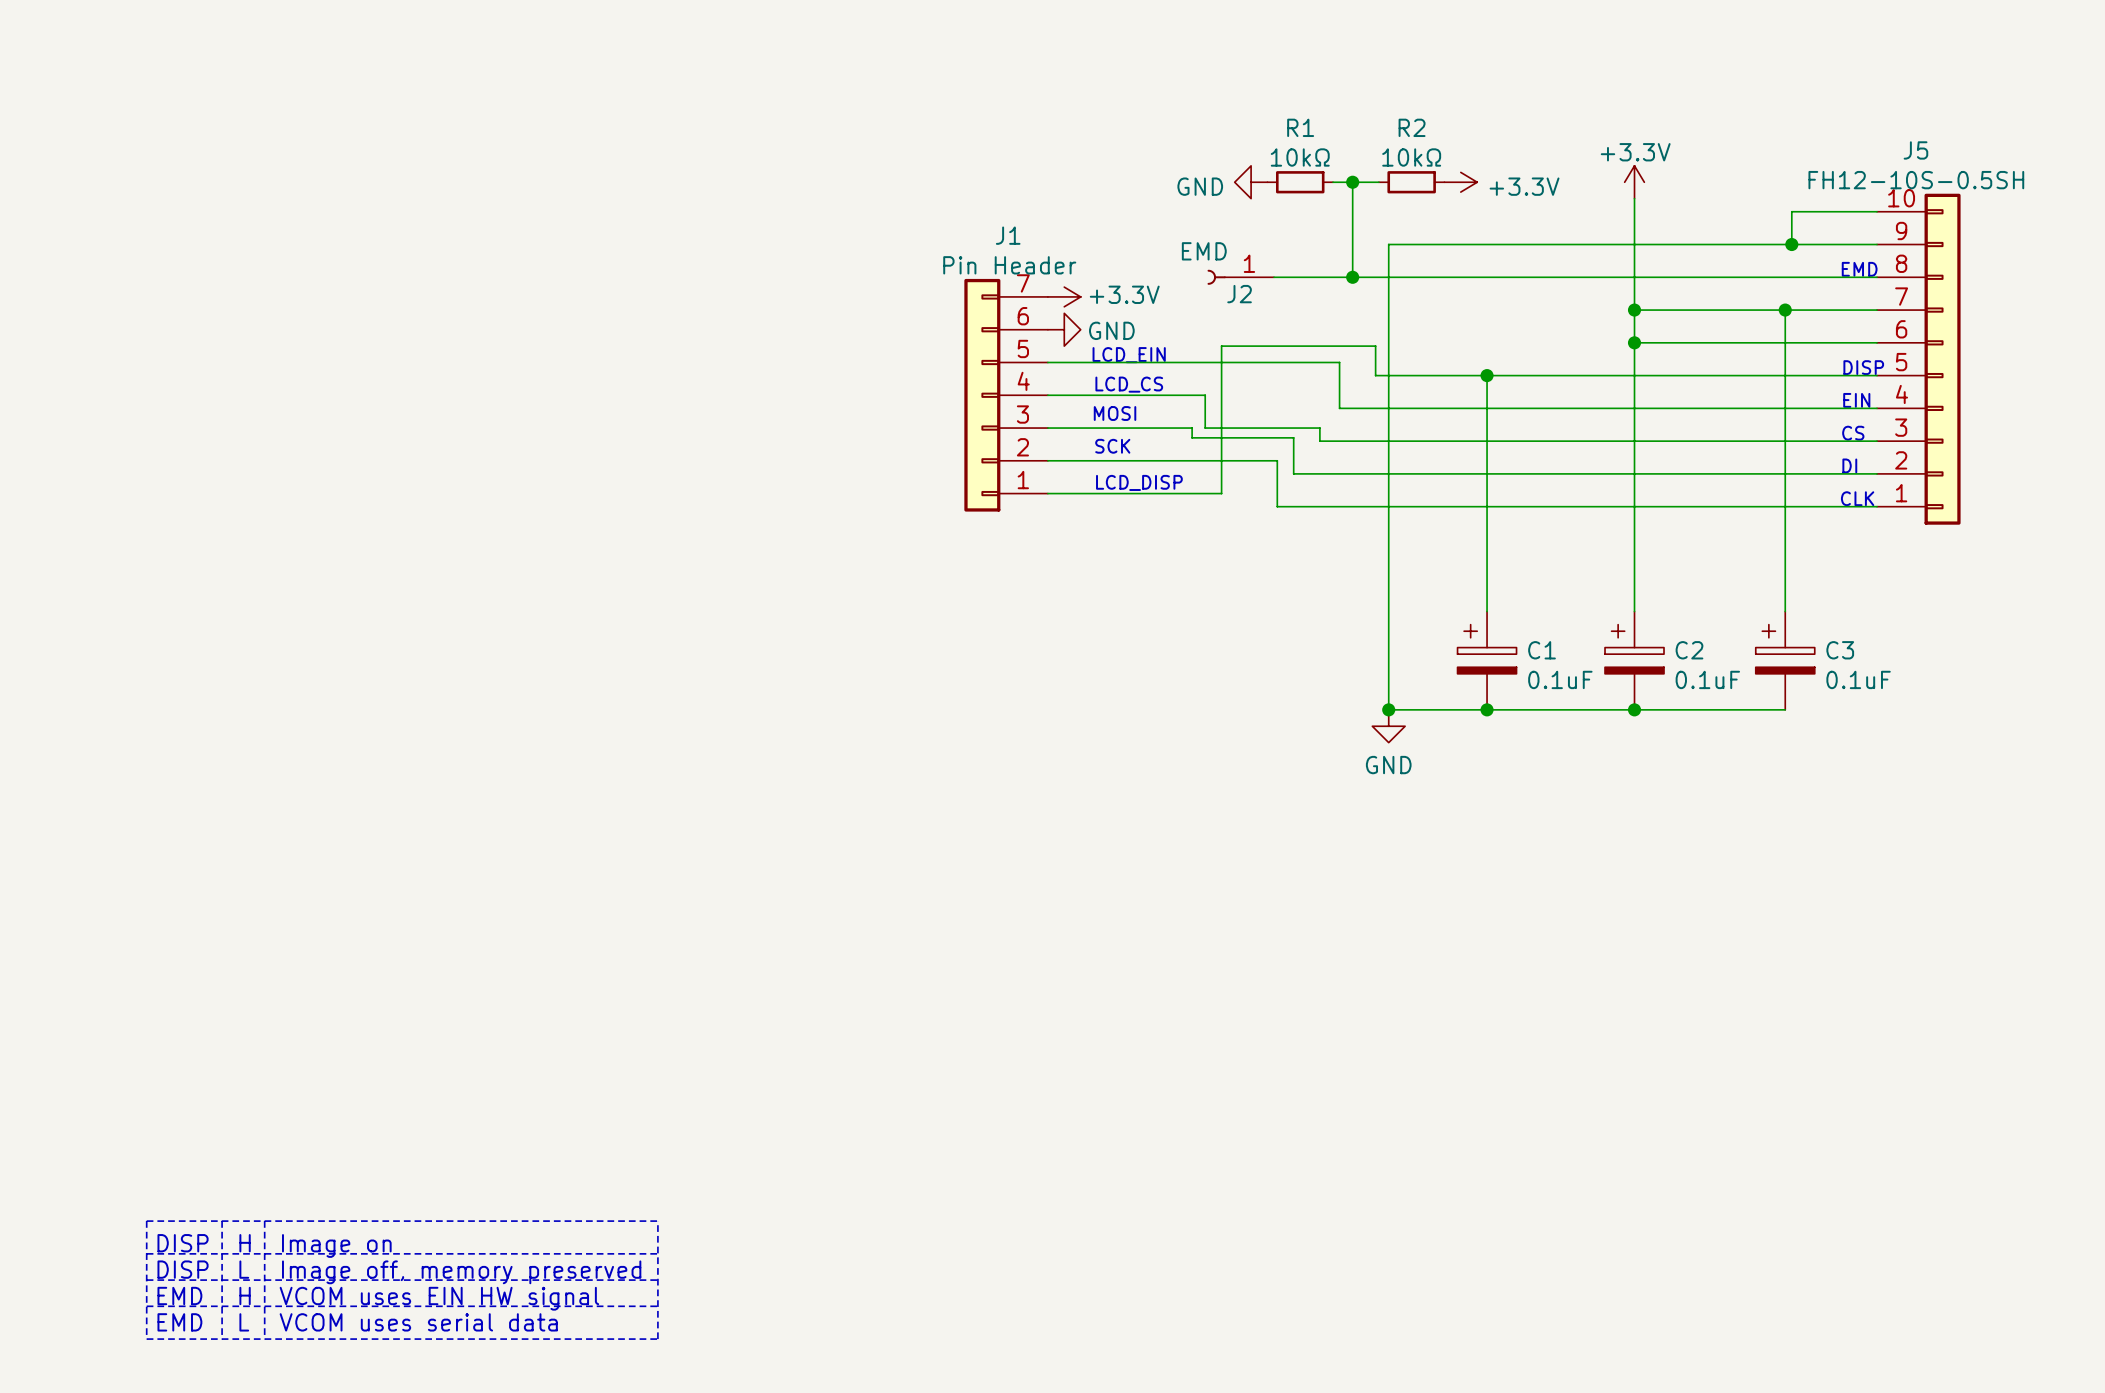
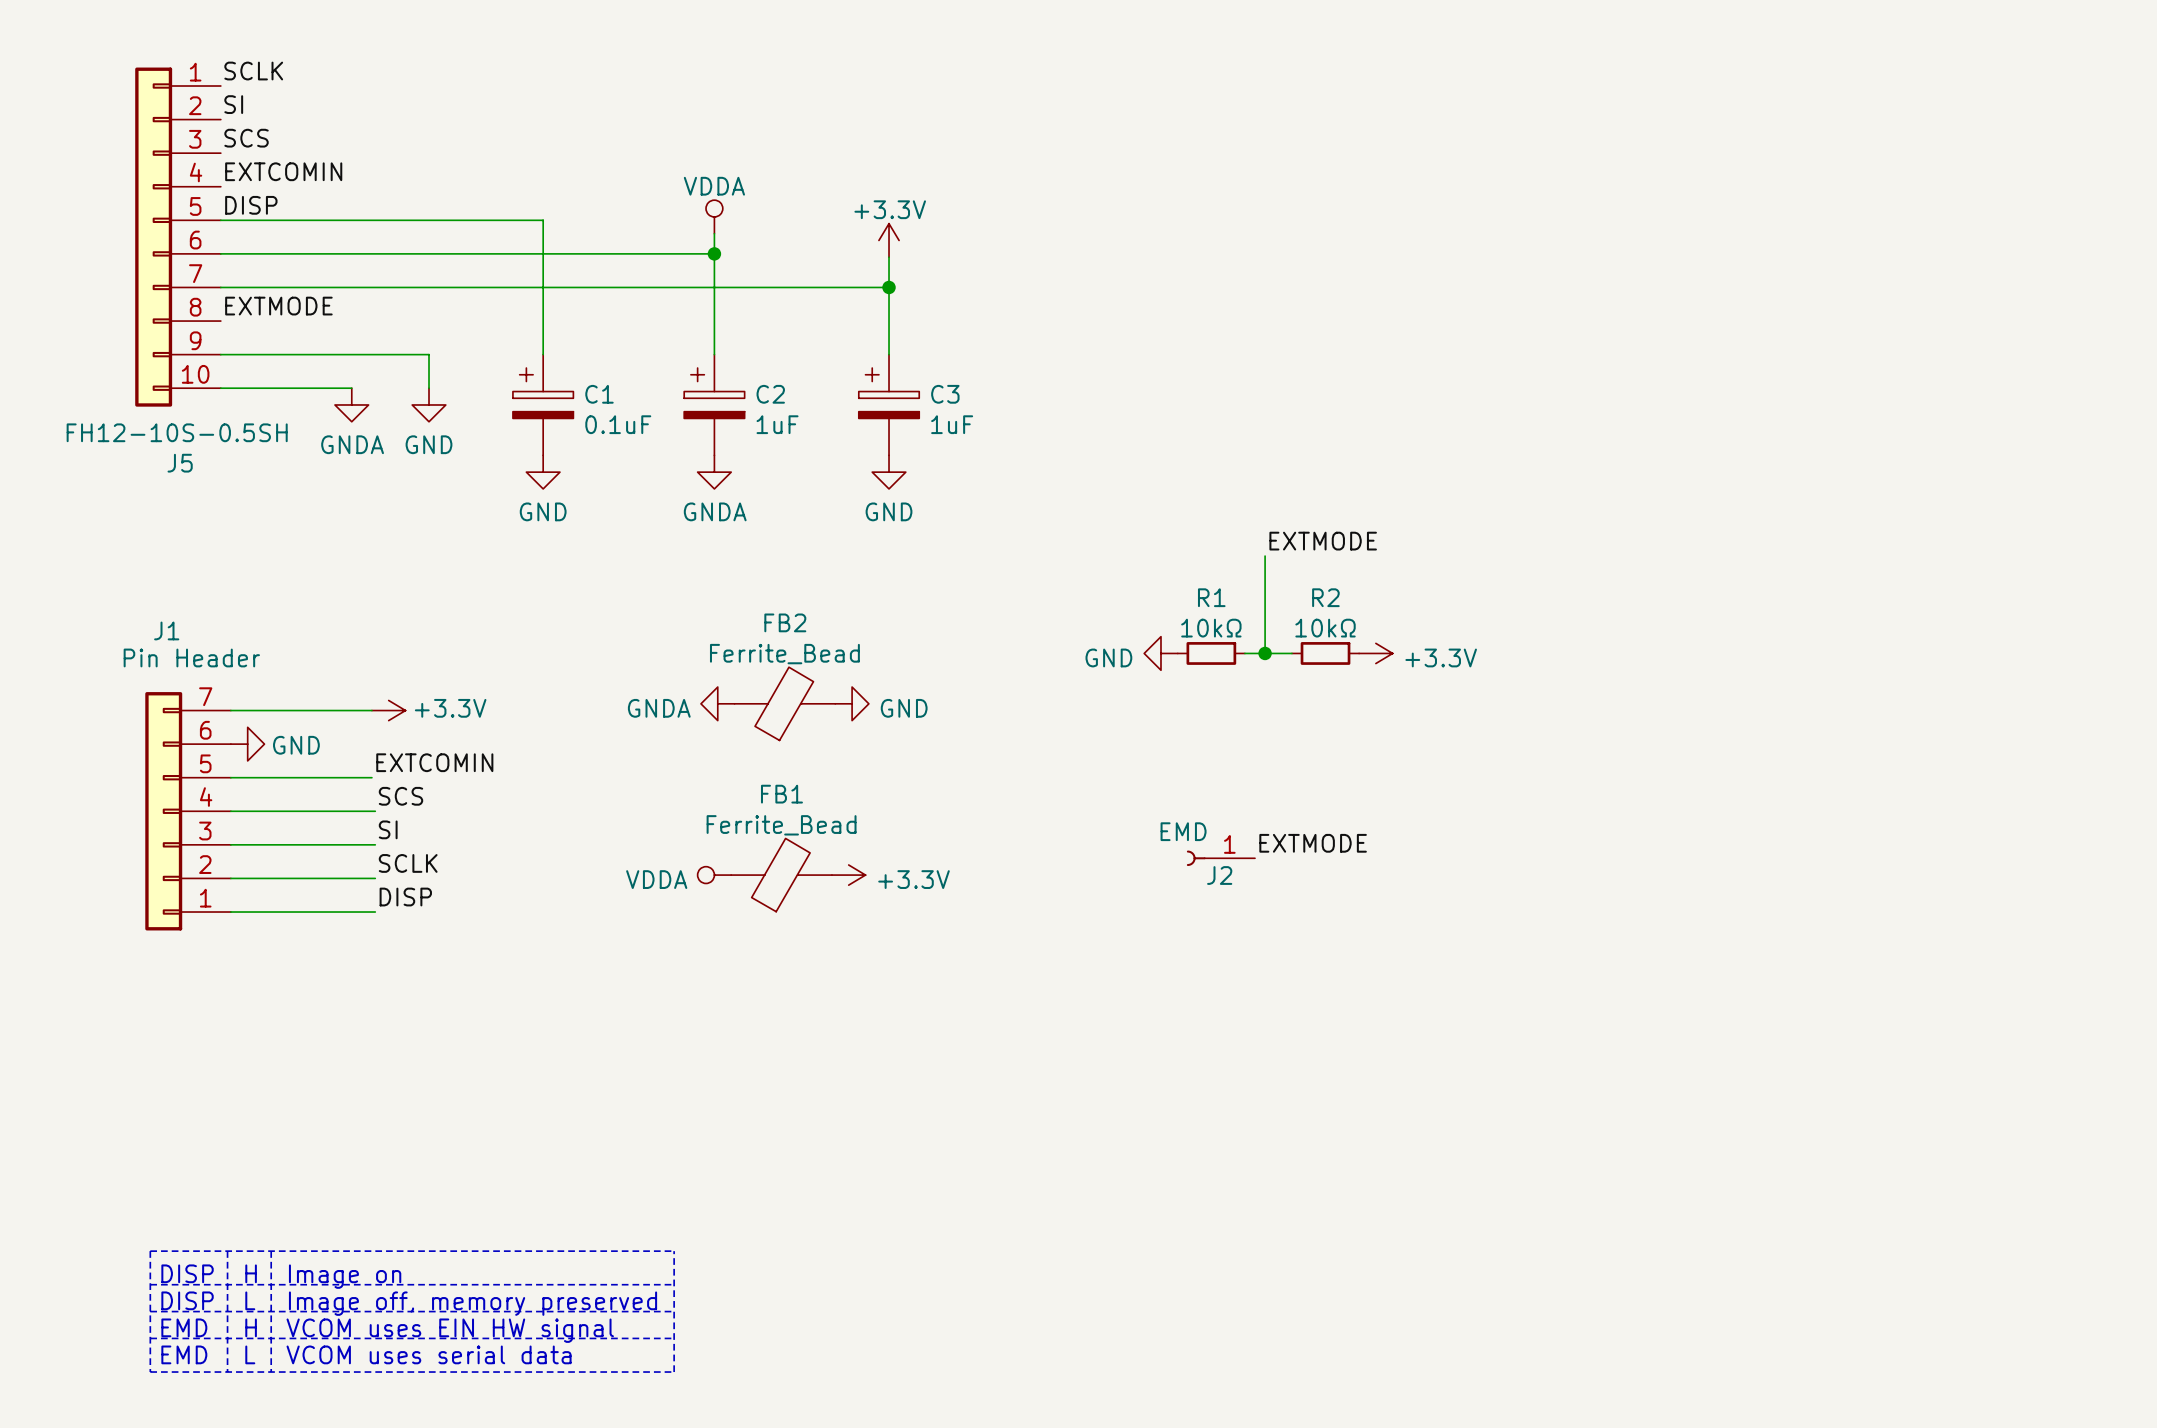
label: none -> SCLK (253, 71)
label: none -> SI (233, 104)
label: none -> SCS (246, 138)
label: none -> EXTCOMIN (283, 171)
power symbol: GND (1251, 182) -> none
R1 position: (1300, 182) -> (1211, 653)
wire: (1333, 182) (1378, 182) -> none
wire: (1352, 182) (1352, 277) -> none
junction: (1352, 182) -> none
R2 position: (1411, 182) -> (1325, 653)
power symbol: +3.3V (1460, 182) -> none
power symbol: +3.3V (1634, 182) -> none
wire: (1634, 198) (1634, 611) -> none
label: none -> DISP (251, 205)
power symbol: none -> VDDA (714, 216)
wire: (1877, 211) (1791, 211) (1791, 244) -> none
wire: none -> (220, 220) (543, 220) (543, 354)
wire: none -> (714, 233) (714, 354)
J1 name position: J1 (1008, 235) -> J1 (166, 630)
junction: (1791, 244) -> none
wire: (1877, 244) (1388, 244) (1388, 709) (1785, 709) -> none
wire: none -> (220, 253) (714, 253)
junction: none -> (714, 253)
wire: none -> (889, 257) (889, 354)
J1 value position: Pin Header (1009, 265) -> Pin Header (191, 657)
text: EMD (1859, 269) -> none
J2 position: (1240, 277) -> (1220, 858)
wire: (1274, 277) (1877, 277) -> none
junction: (1352, 277) -> none
wire: none -> (220, 287) (889, 287)
junction: none -> (889, 287)
power symbol text position: +3.3V (1124, 294) -> +3.3V (890, 209)
power symbol rotation: 0° (1064, 296) -> 90° counterclockwise (889, 240)
power symbol position: +3.3V (1064, 296) -> +3.3V (889, 240)
label: none -> EXTMODE (278, 306)
wire: (1634, 310) (1877, 310) -> none
junction: (1634, 310) -> none
wire: (1785, 310) (1785, 611) -> none
junction: (1785, 310) -> none
power symbol: GND (1064, 329) -> none
wire: (1634, 342) (1877, 342) -> none
junction: (1634, 342) -> none
wire: none -> (220, 354) (429, 354) (429, 388)
text: LCD_EIN (1129, 355) -> none
J5 position: (1918, 359) -> (178, 237)
J5 rotation: 0° (1942, 359) -> 180° (153, 237)
wire: (1047, 362) (1339, 362) (1339, 408) (1877, 408) -> none
text: DISP (1863, 367) -> none
wire: (1487, 375) (1487, 611) -> none
junction: (1487, 375) -> none
wire: (1877, 375) (1375, 375) (1375, 346) (1221, 346) (1221, 493) (1047, 493) -> none
wire: none -> (220, 388) (351, 388)
text: LCD_CS (1129, 384) -> none
power symbol: none -> GNDA (351, 404)
power symbol: none -> GND (429, 404)
J1 position: (1006, 395) -> (188, 811)
wire: (1047, 395) (1205, 395) (1205, 428) (1319, 428) (1319, 441) (1877, 441) -> none
text: EIN (1856, 400) -> none
text: MOSI (1115, 413) -> none
wire: (1047, 428) (1192, 428) (1192, 437) (1293, 437) (1293, 473) (1877, 473) -> none
text: CS (1853, 433) -> none
text: SCK (1112, 446) -> none
power symbol: none -> GND (543, 472)
power symbol: none -> GNDA (714, 472)
power symbol: none -> GND (889, 472)
wire: (1047, 460) (1277, 460) (1277, 506) (1877, 506) -> none
text: DI (1849, 465) -> none
text: LCD_DISP (1139, 482) -> none
text: CLK (1857, 498) -> none
label: none -> EXTMODE (1323, 541)
wire: none -> (1265, 556) (1265, 653)
power symbol: none -> GND (1160, 653)
wire: none -> (1244, 653) (1291, 653)
junction: none -> (1265, 653)
power symbol: none -> +3.3V (1375, 653)
C1 position: (1487, 660) -> (543, 404)
C2 position: (1634, 660) -> (714, 404)
C3 position: (1785, 660) -> (889, 404)
C2 value: 0.1uF (1707, 679) -> 1uF (777, 424)
C3 value: 0.1uF (1858, 679) -> 1uF (952, 424)
power symbol: none -> GNDA (717, 703)
FB2: none -> Ferrite_Bead (784, 703)
power symbol: none -> GND (852, 703)
wire: none -> (230, 710) (371, 710)
power symbol: none -> +3.3V (388, 710)
junction: (1388, 709) -> none
junction: (1487, 709) -> none
junction: (1634, 709) -> none
power symbol: none -> GND (247, 744)
power symbol: GND (1388, 726) -> none
label: none -> EXTCOMIN (434, 762)
wire: none -> (230, 777) (371, 777)
label: none -> SCS (400, 796)
wire: none -> (230, 811) (375, 811)
label: none -> SI (388, 829)
label: none -> EXTMODE (1313, 843)
wire: none -> (230, 844) (375, 844)
label: none -> SCLK (408, 863)
power symbol: none -> VDDA (714, 875)
FB1: none -> Ferrite_Bead (781, 875)
power symbol: none -> +3.3V (848, 875)
wire: none -> (230, 878) (375, 878)
label: none -> DISP (405, 897)
wire: none -> (230, 912) (375, 912)

